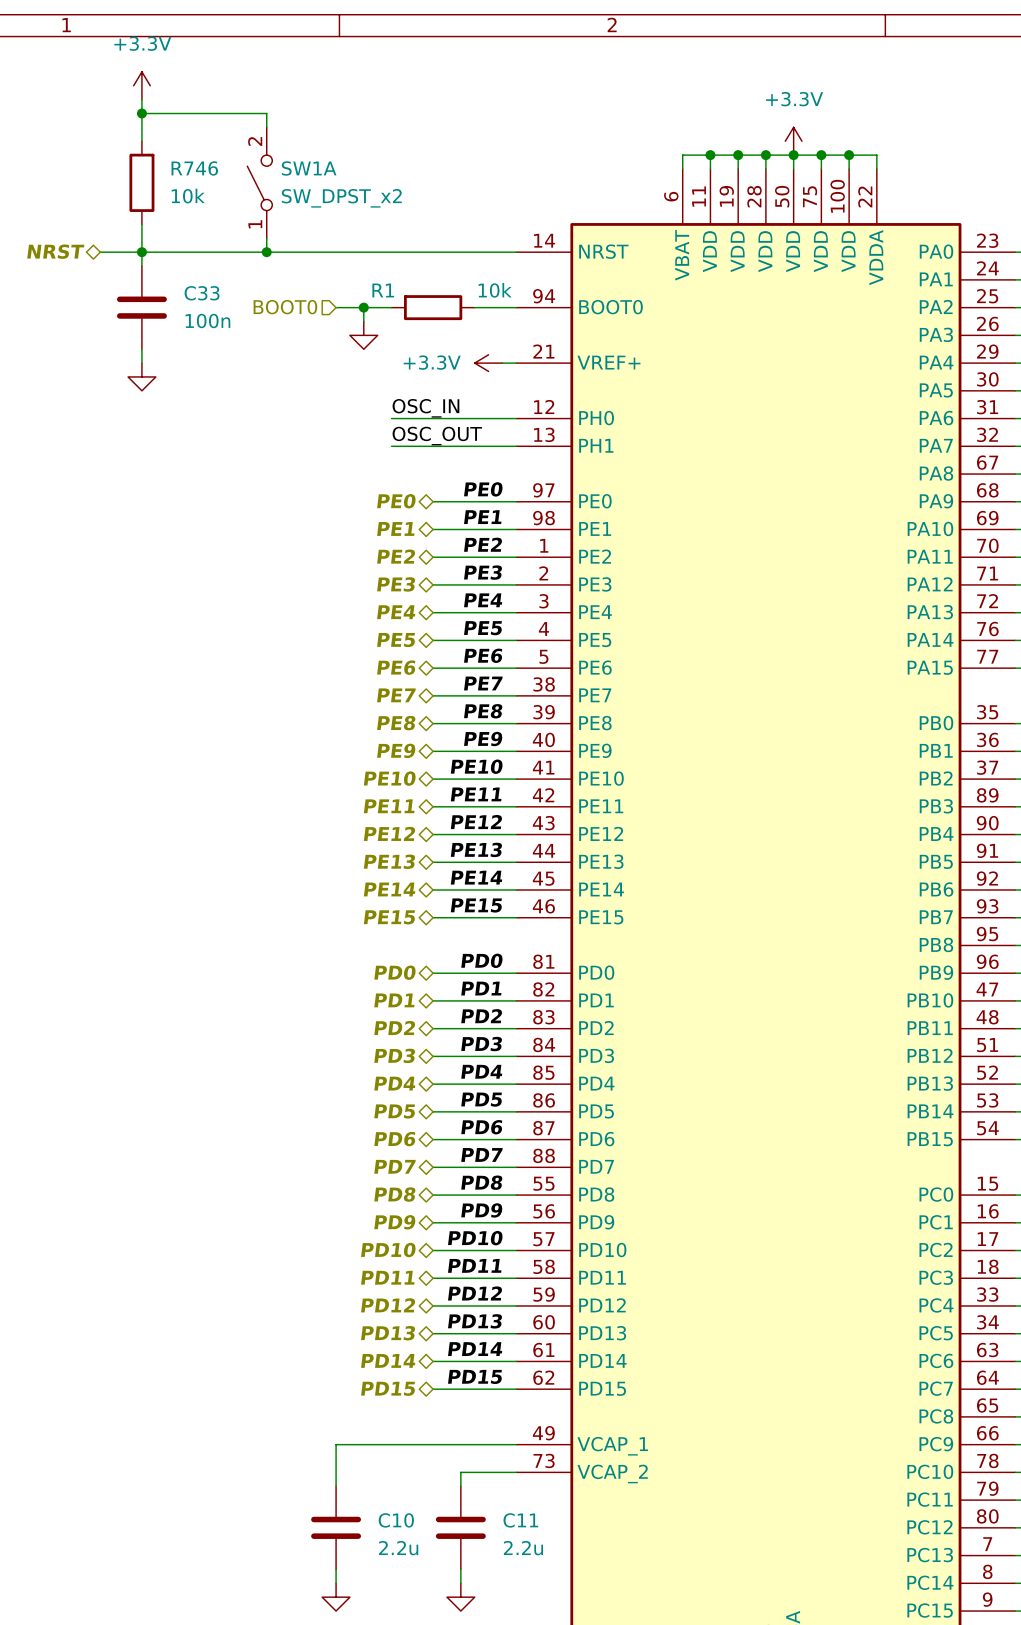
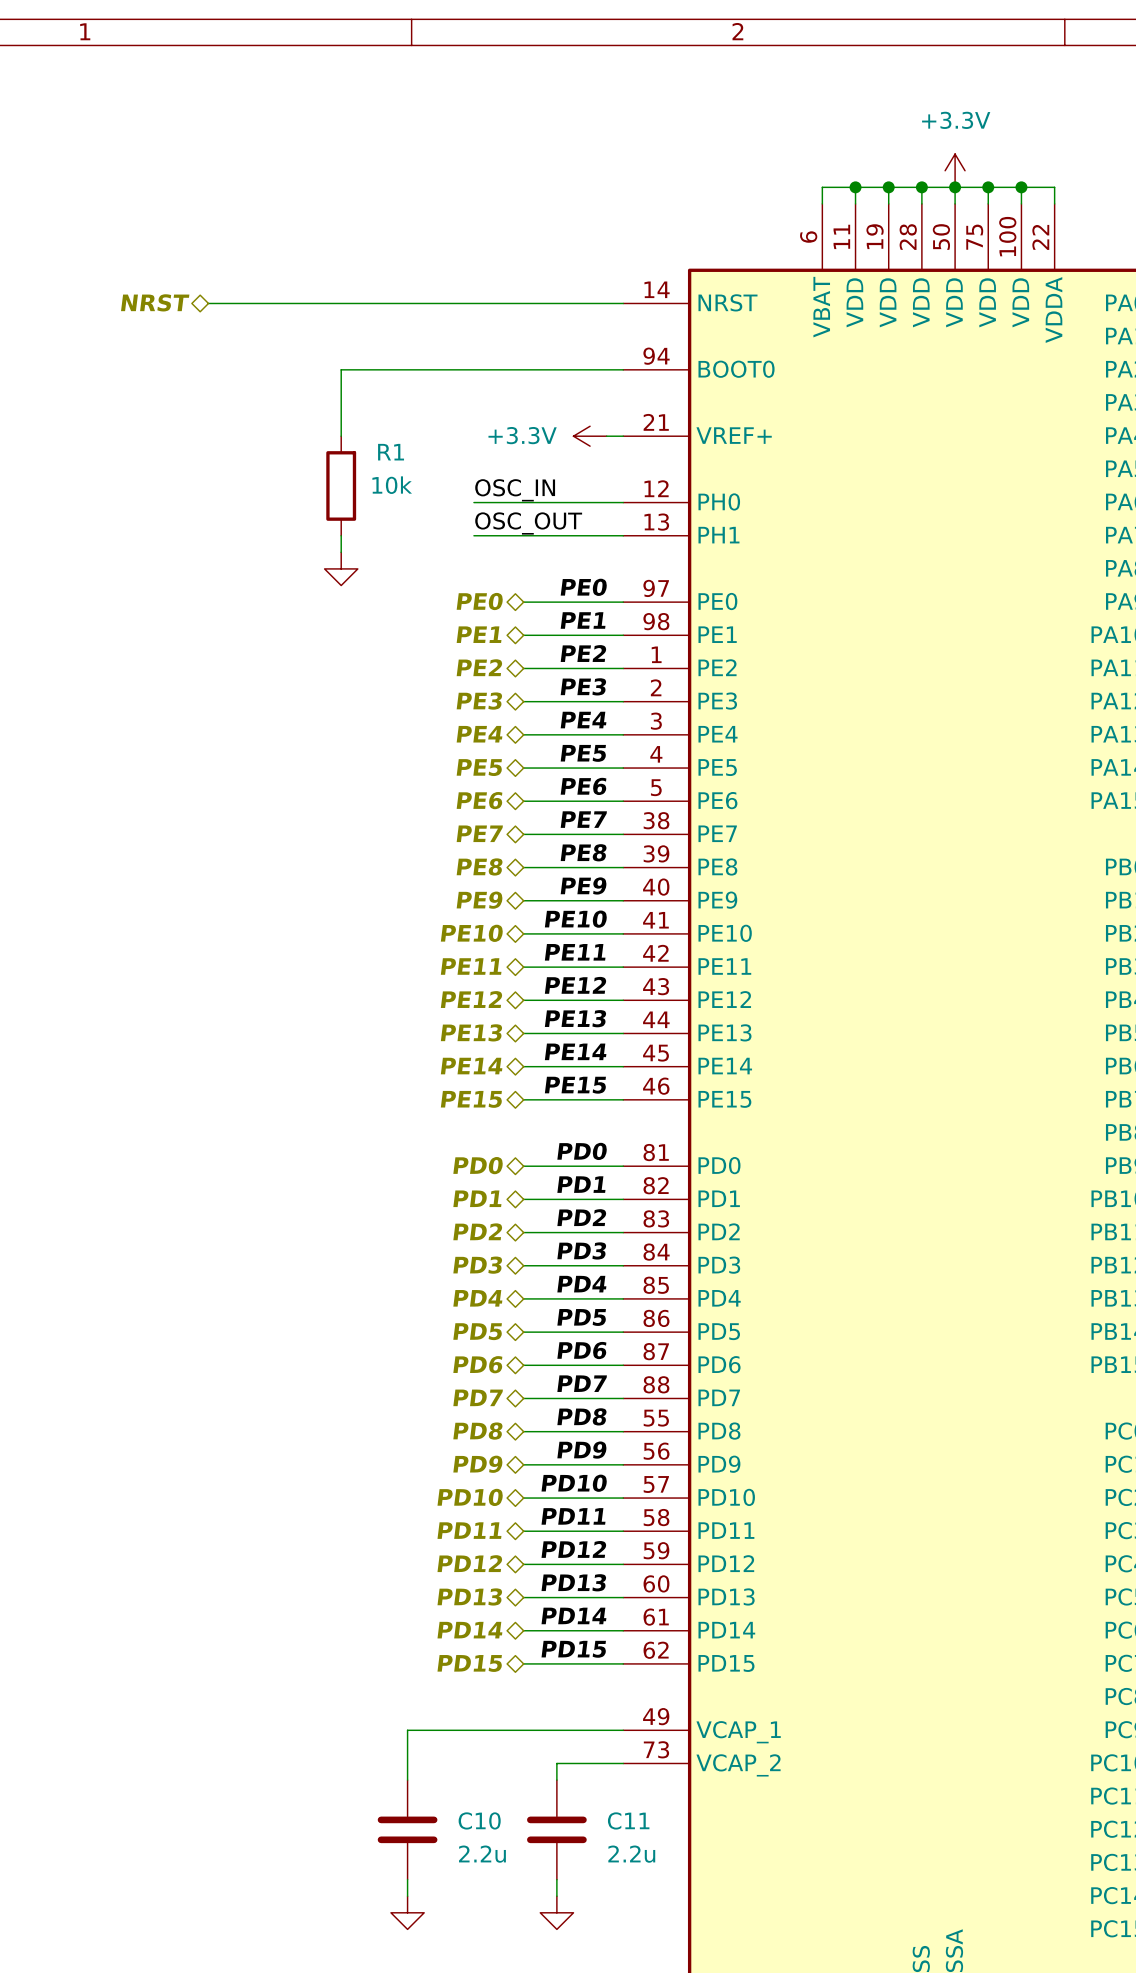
power symbol: +3.3V (141, 85) -> none
wire: (141, 99) (141, 141) -> none
wire: (141, 113) (266, 113) (266, 127) -> none
junction: (141, 113) -> none
R746: 10k (141, 182) -> none
SW1A: SW_DPST_x2 (259, 182) -> none
wire: (141, 224) (141, 266) -> none
wire: (266, 238) (266, 252) -> none
hierarchical label position: NRST (55, 251) -> NRST (155, 302)
wire: (100, 252) (169, 252) -> none
junction: (141, 252) -> none
junction: (266, 252) -> none
R1 name position: R1 (383, 290) -> R1 (391, 452)
R1 value position: 10k (495, 290) -> 10k (392, 485)
C33: 100n (141, 307) -> none
hierarchical label: BOOT0 (285, 307) -> none
wire: none -> (407, 369) (341, 369) (341, 436)
wire: (363, 307) (363, 321) -> (341, 535) (341, 552)
junction: (363, 307) -> none
wire: none -> (473, 369) (573, 369)
R1 rotation: 0° (433, 307) -> 90° clockwise (341, 485)
R1 position: (433, 307) -> (341, 485)
power symbol: (363, 335) -> none
wire: (141, 349) (141, 363) -> none
power symbol: (141, 376) -> none
power symbol: none -> (341, 568)

